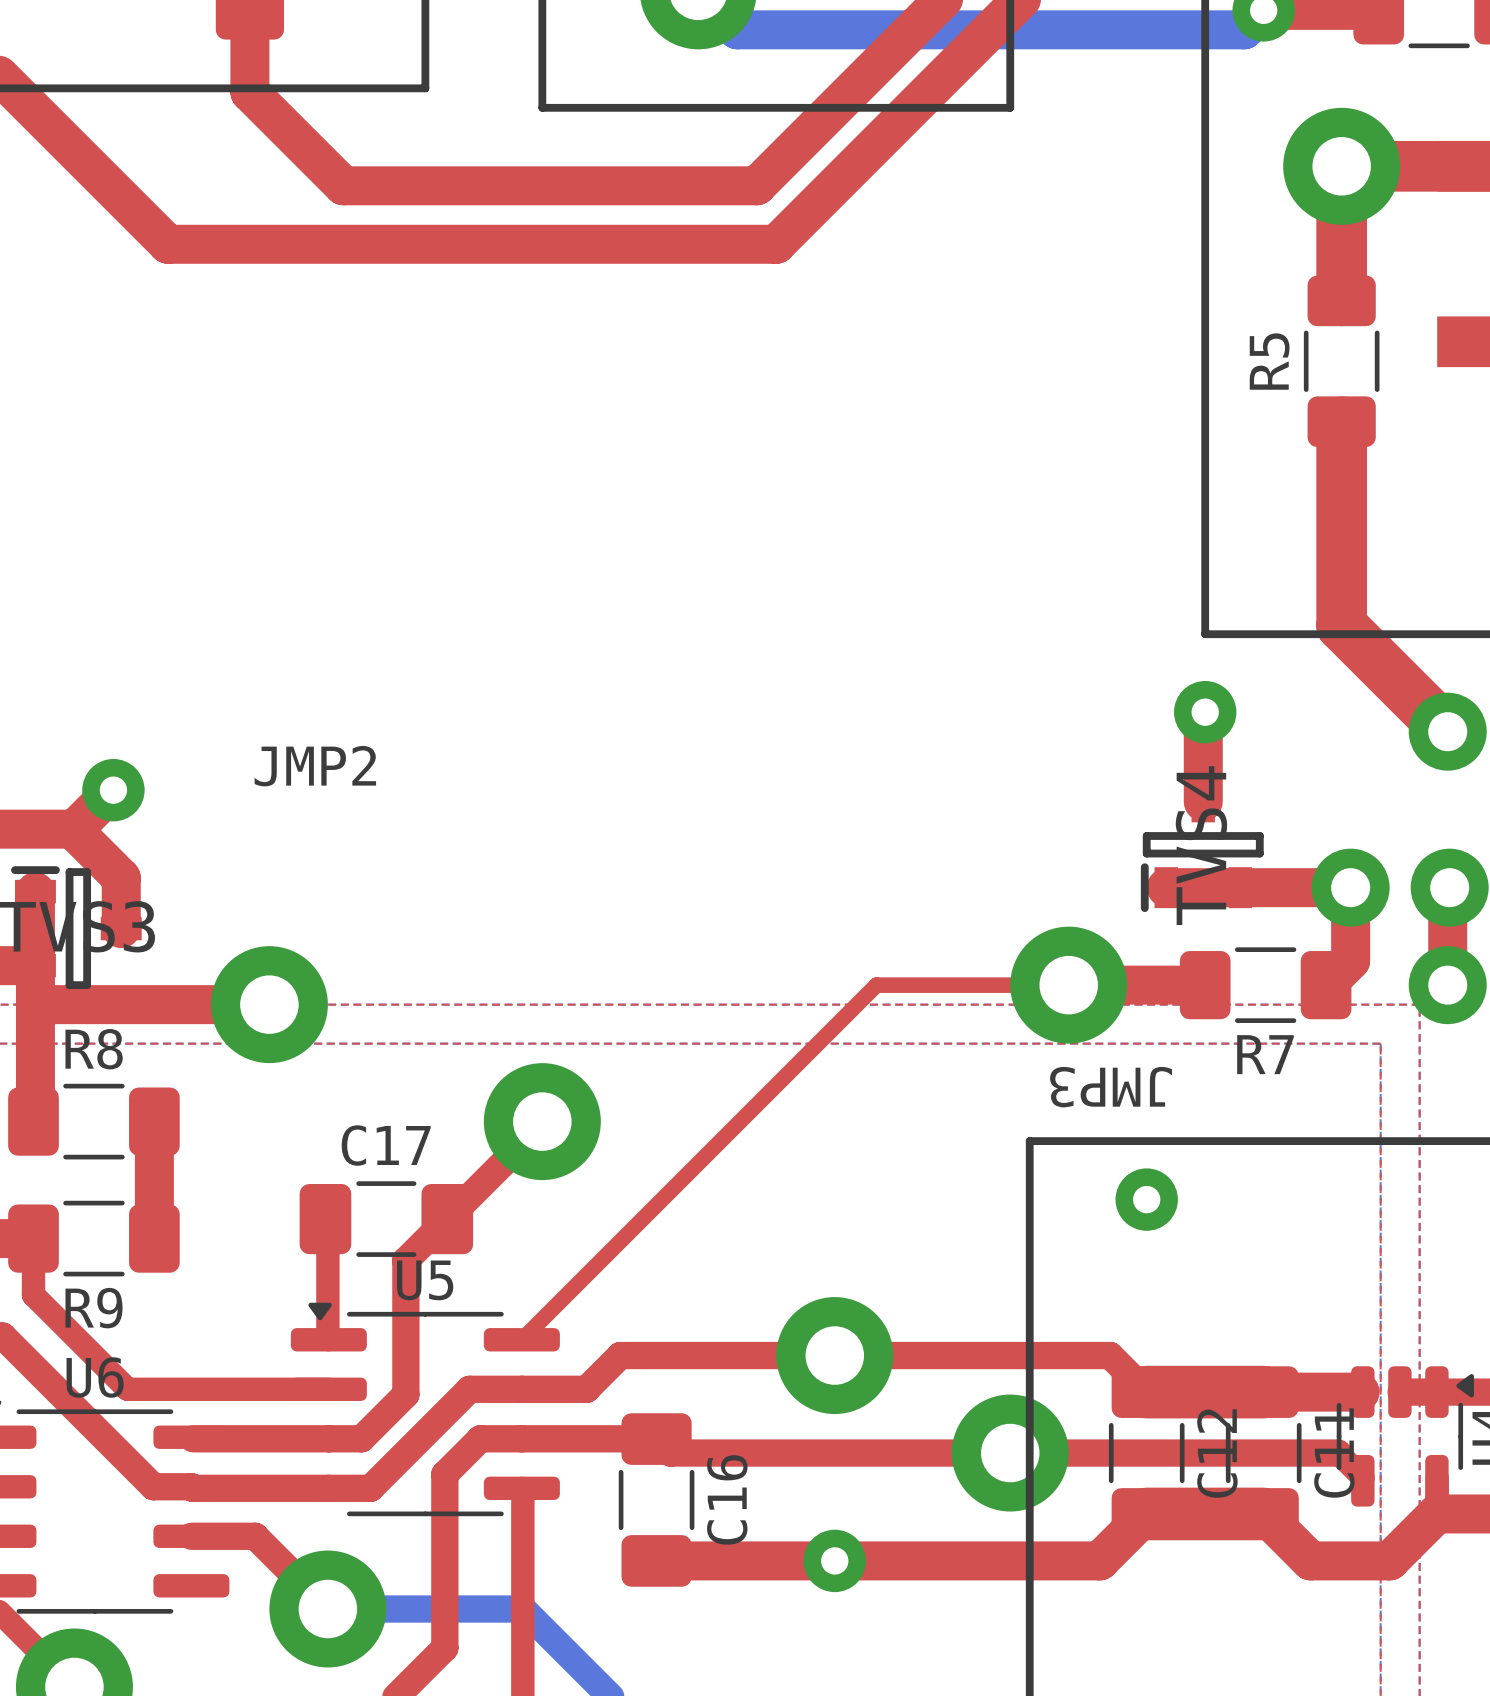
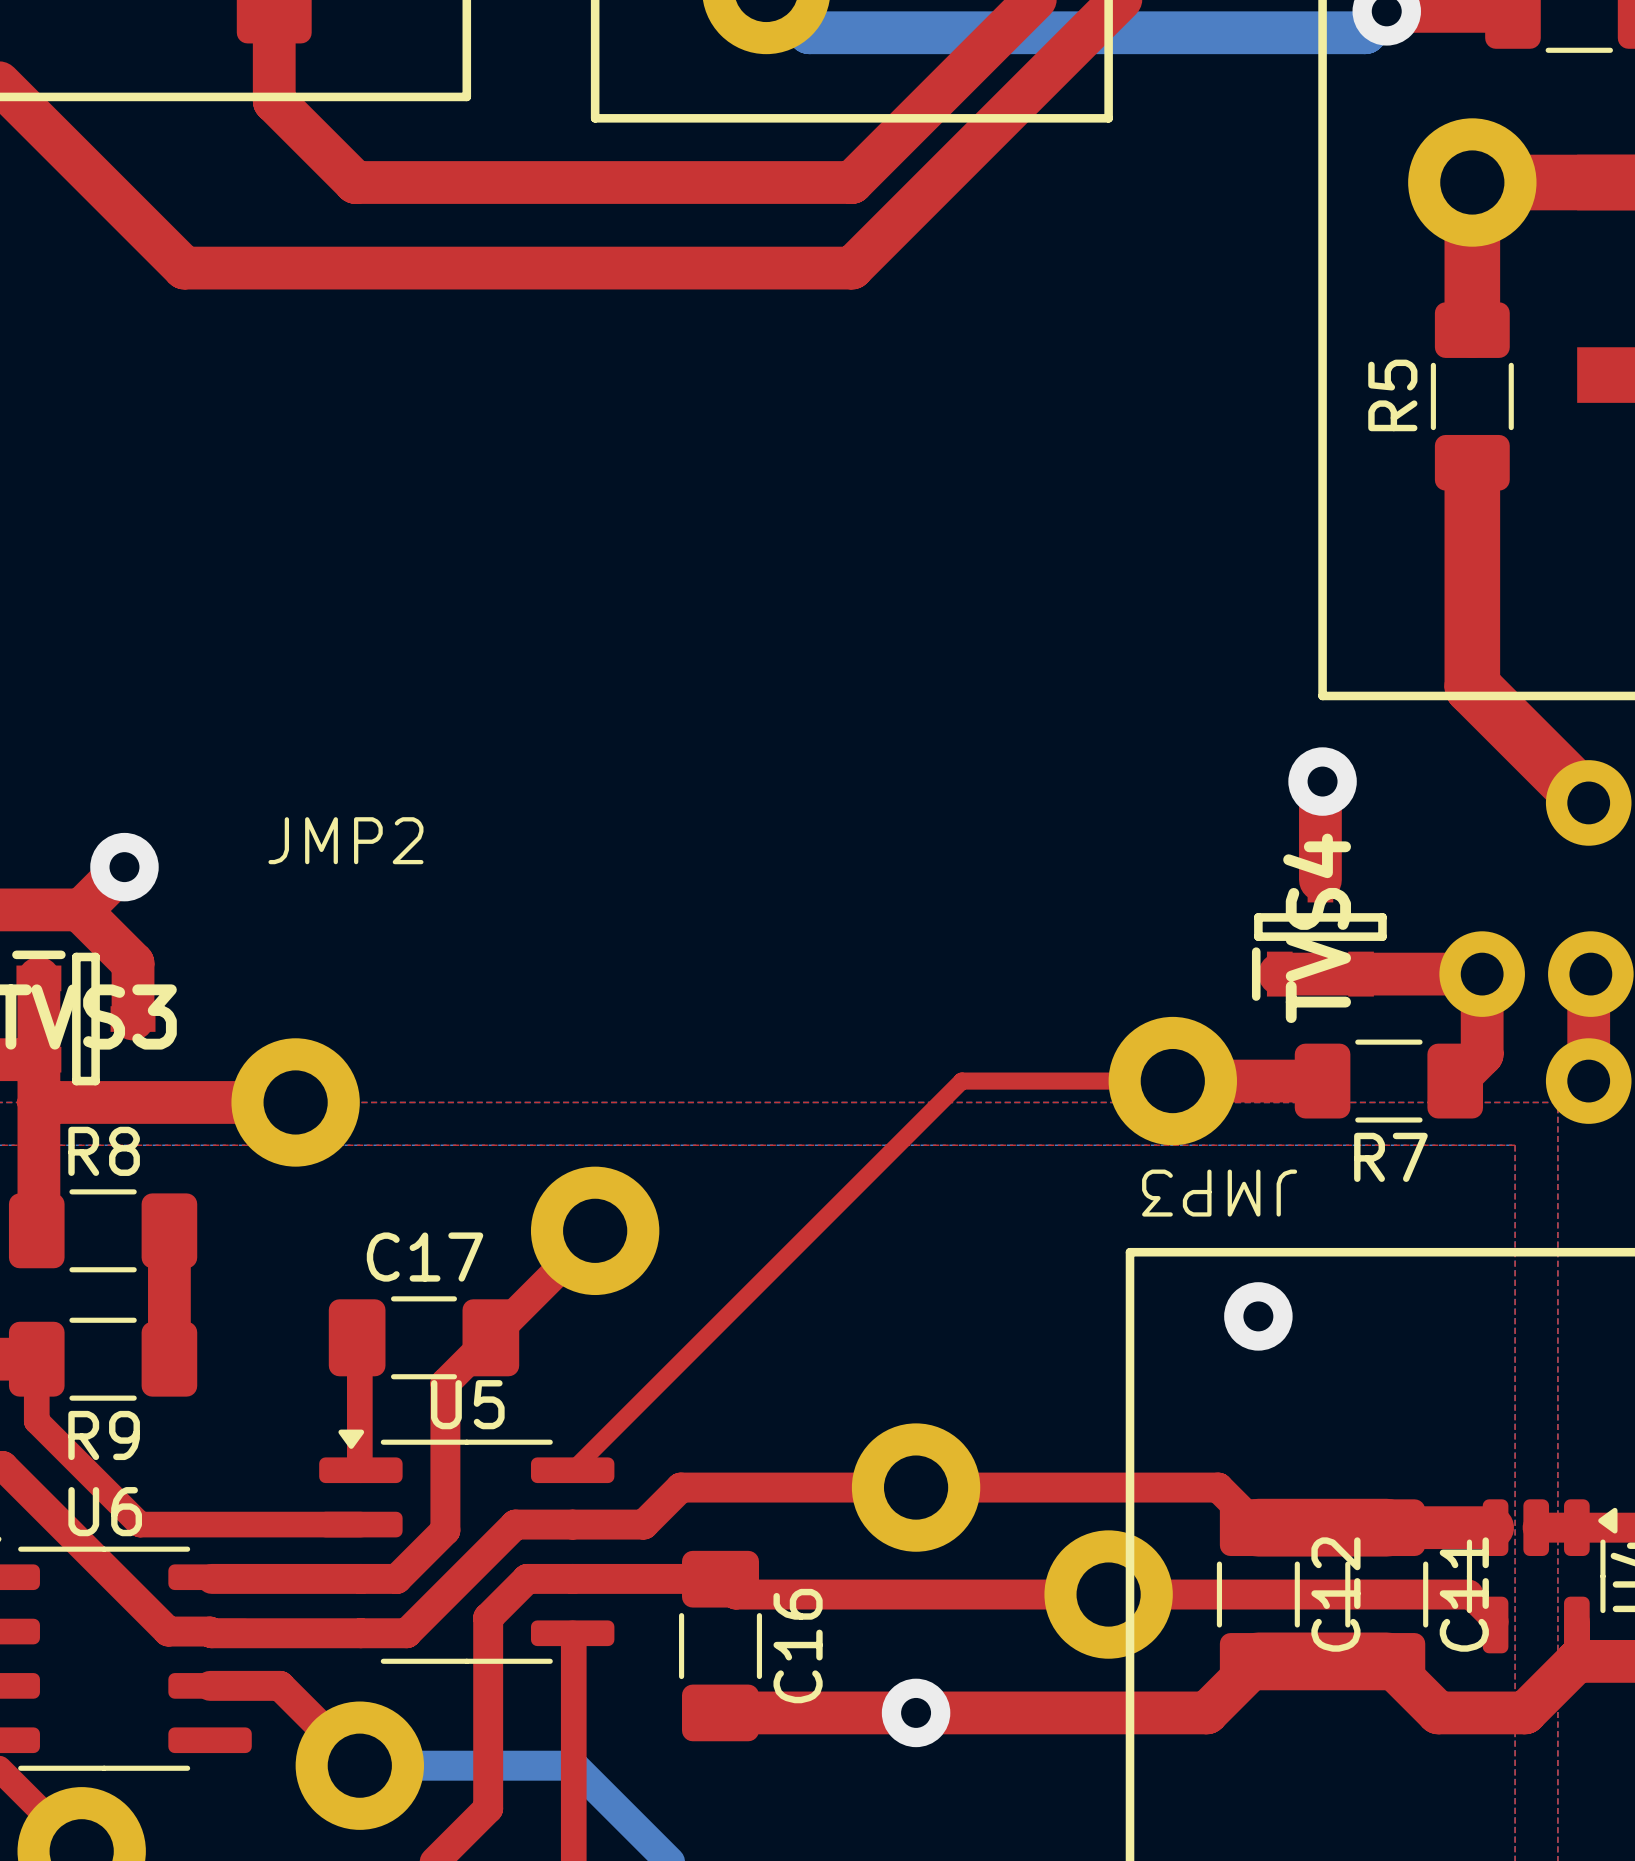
top track: (323, 166) (343, 185) (756, 185) (776, 166) -> (355, 182) (851, 182)

